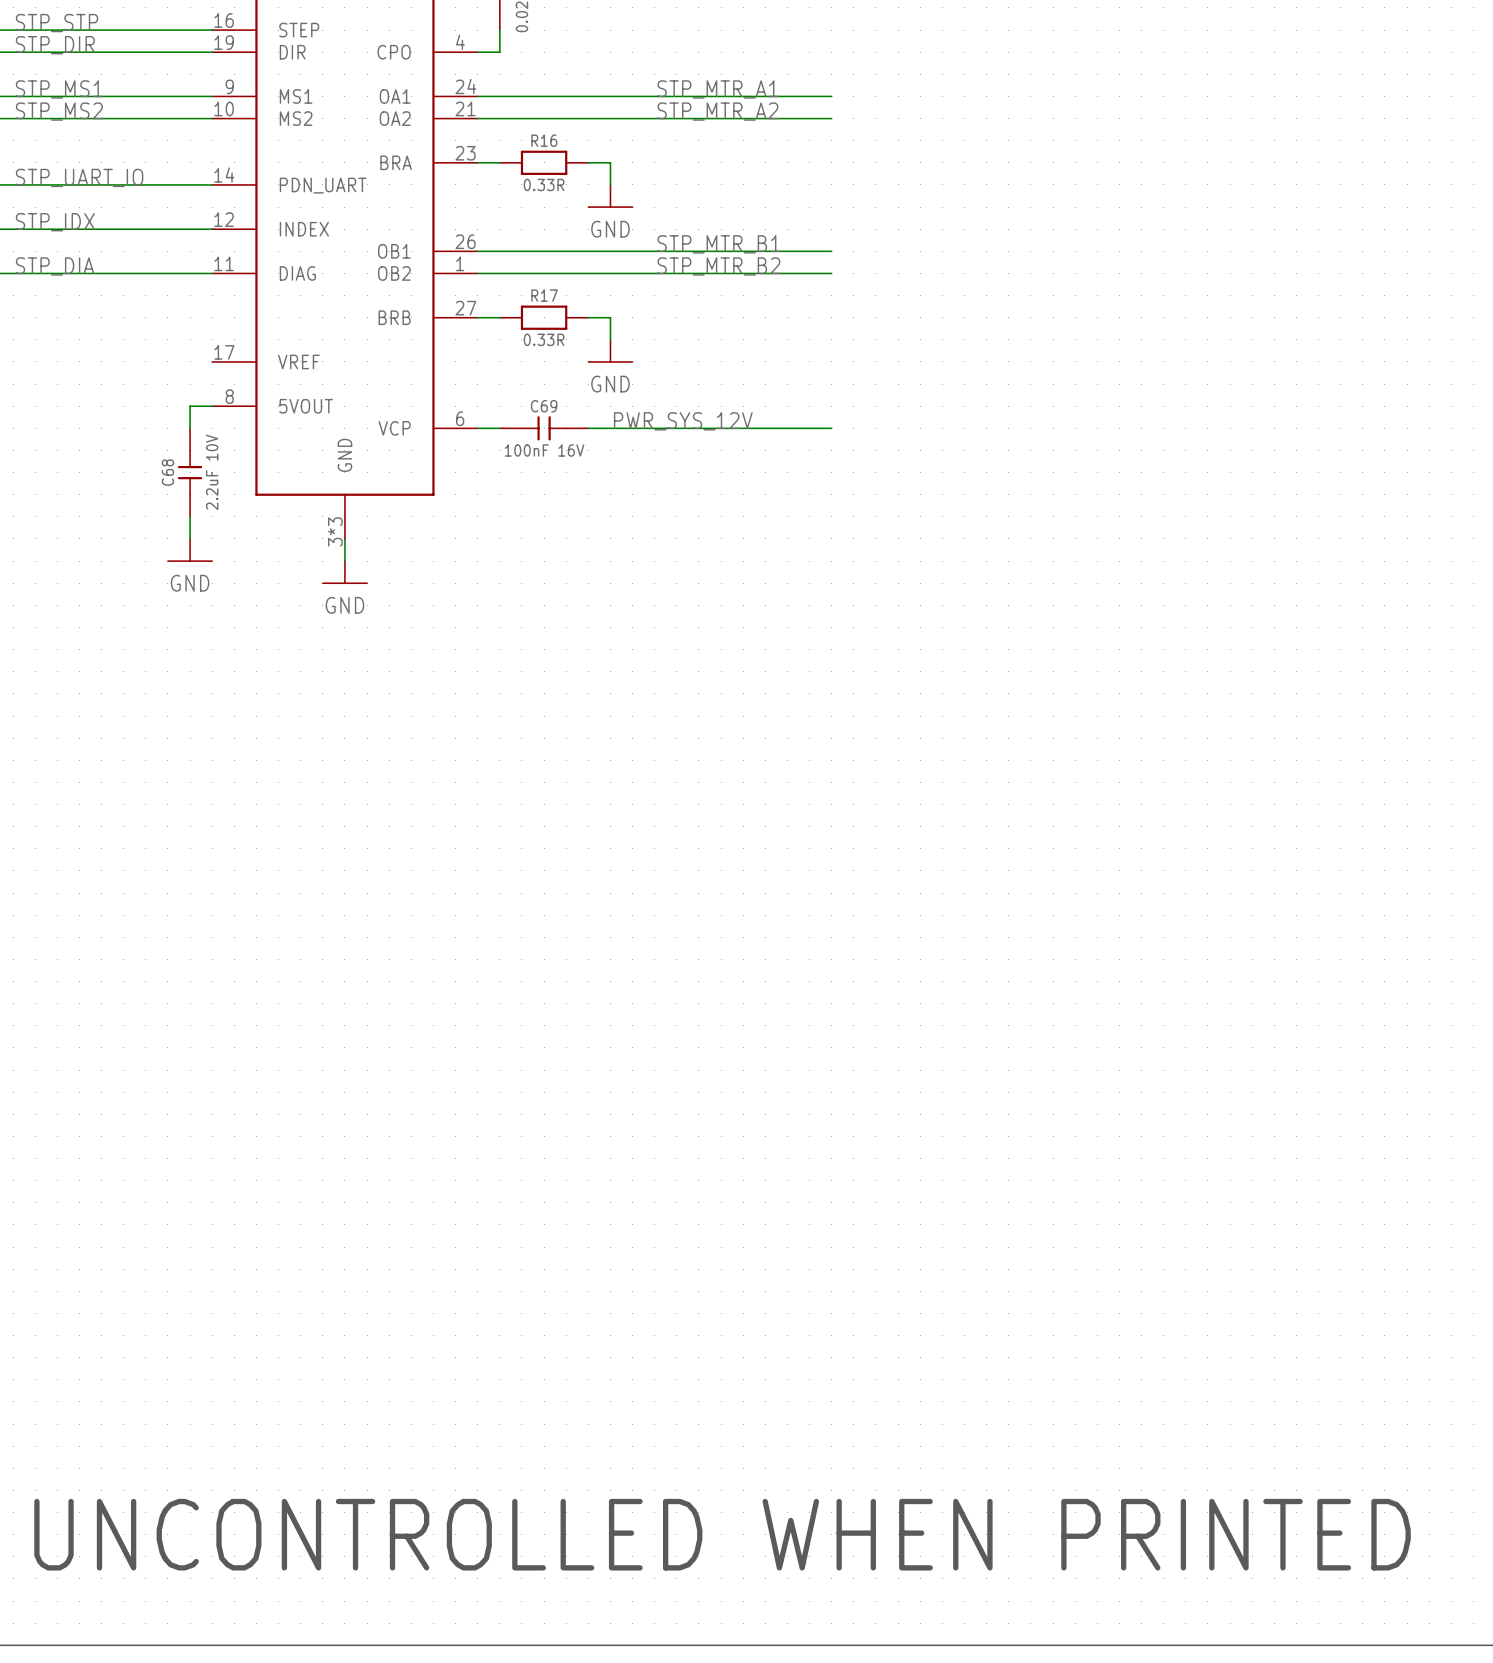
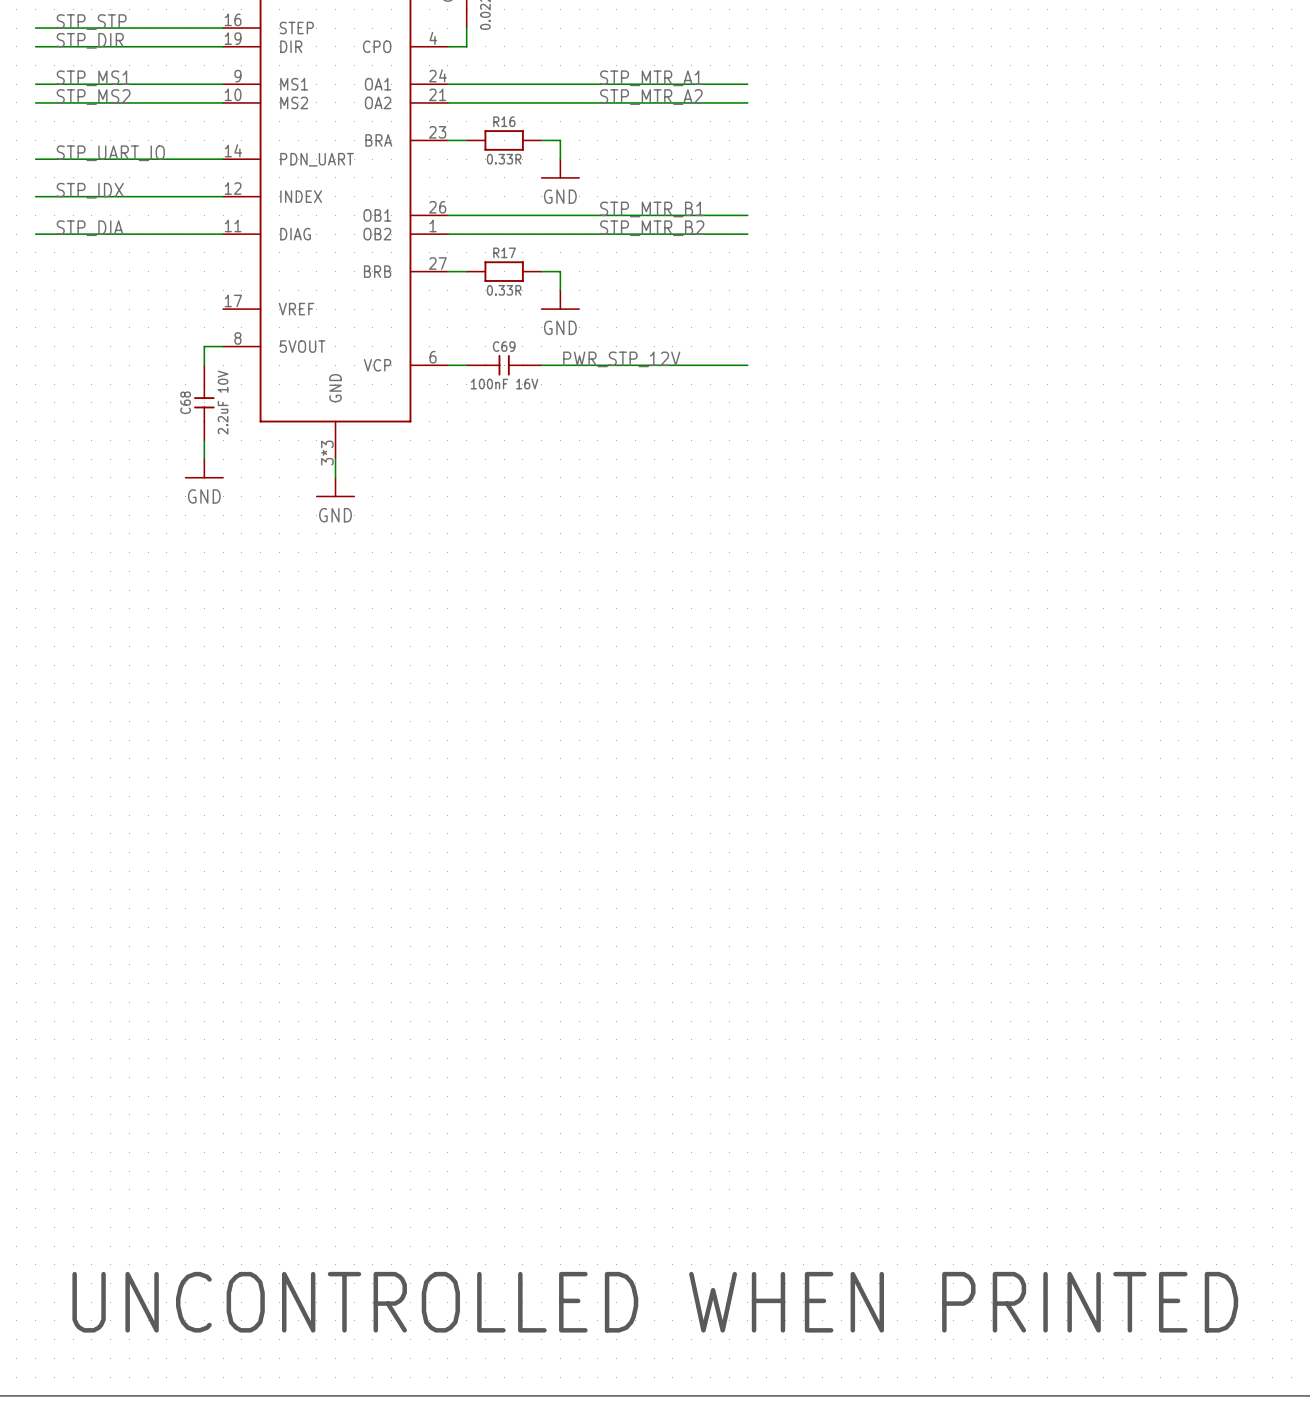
label: PWR_SYS_12V (683, 421) -> PWR_STP_12V (621, 359)

